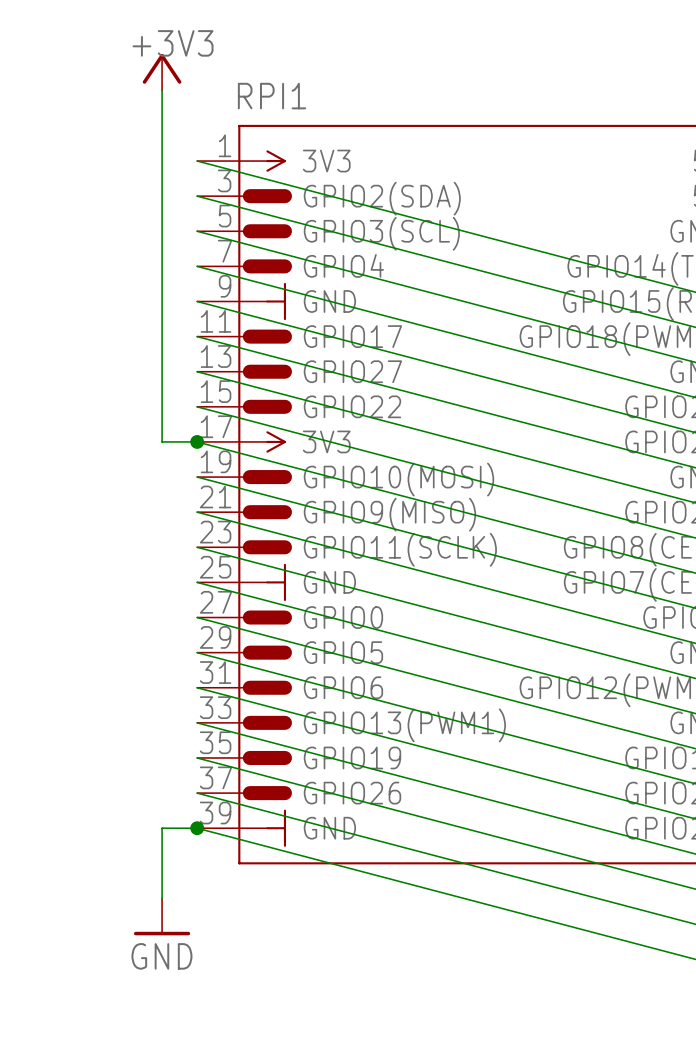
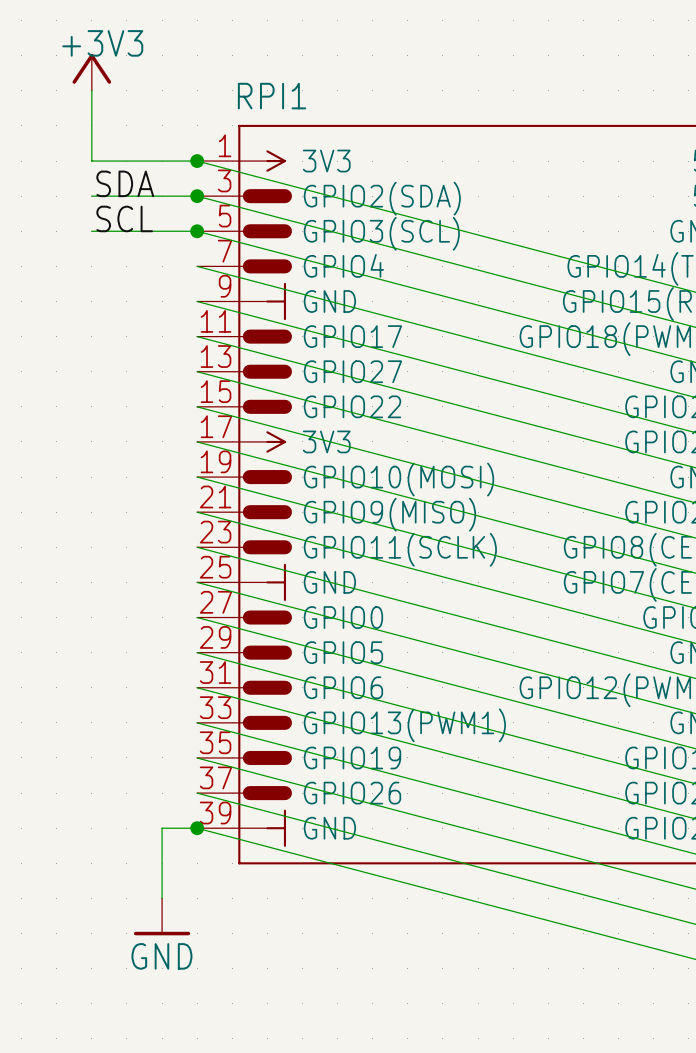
power symbol position: +3V3 (162, 72) -> +3V3 (91, 72)
wire: none -> (91, 90) (91, 161) (197, 161)
wire: (162, 90) (162, 441) (197, 441) -> none
junction: none -> (197, 161)
label: none -> SDA (125, 183)
wire: none -> (91, 196) (197, 196)
junction: none -> (197, 196)
label: none -> SCL (124, 218)
wire: none -> (91, 231) (197, 231)
junction: none -> (197, 231)
junction: (197, 441) -> none

